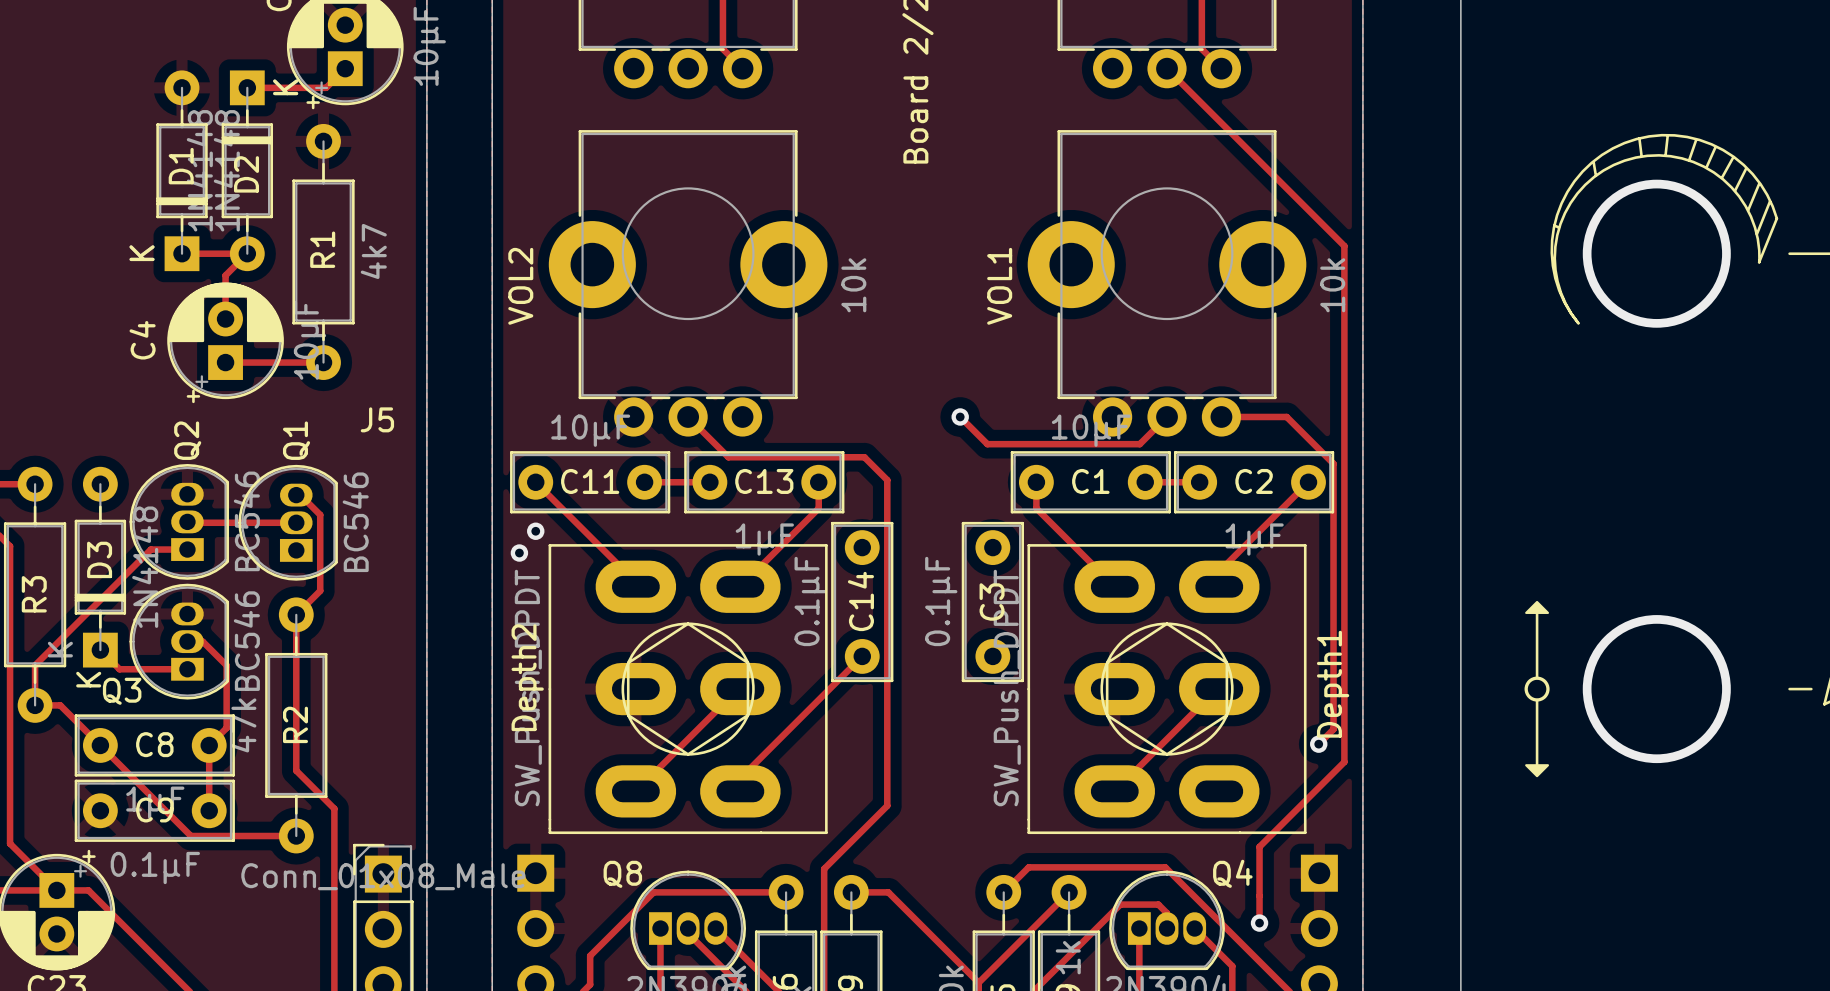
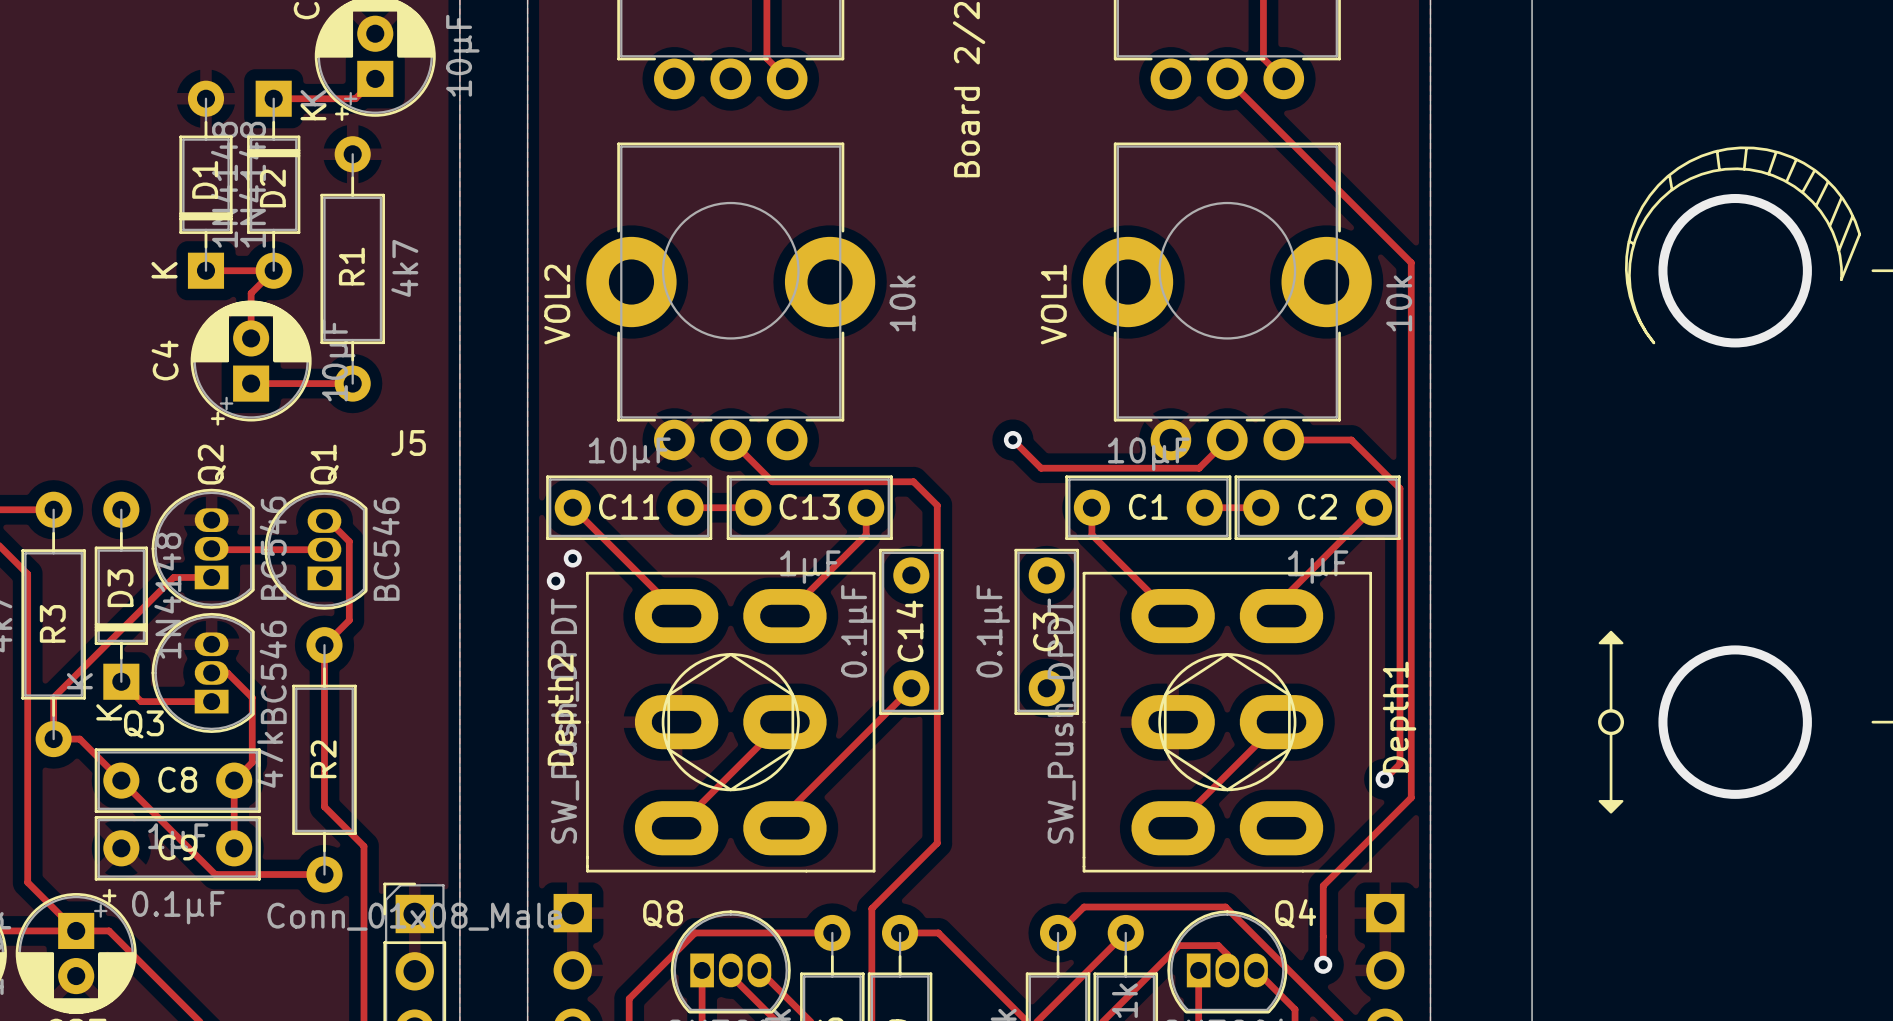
D2 footprint: [221, 70, 274, 272] -> [247, 80, 301, 289]

